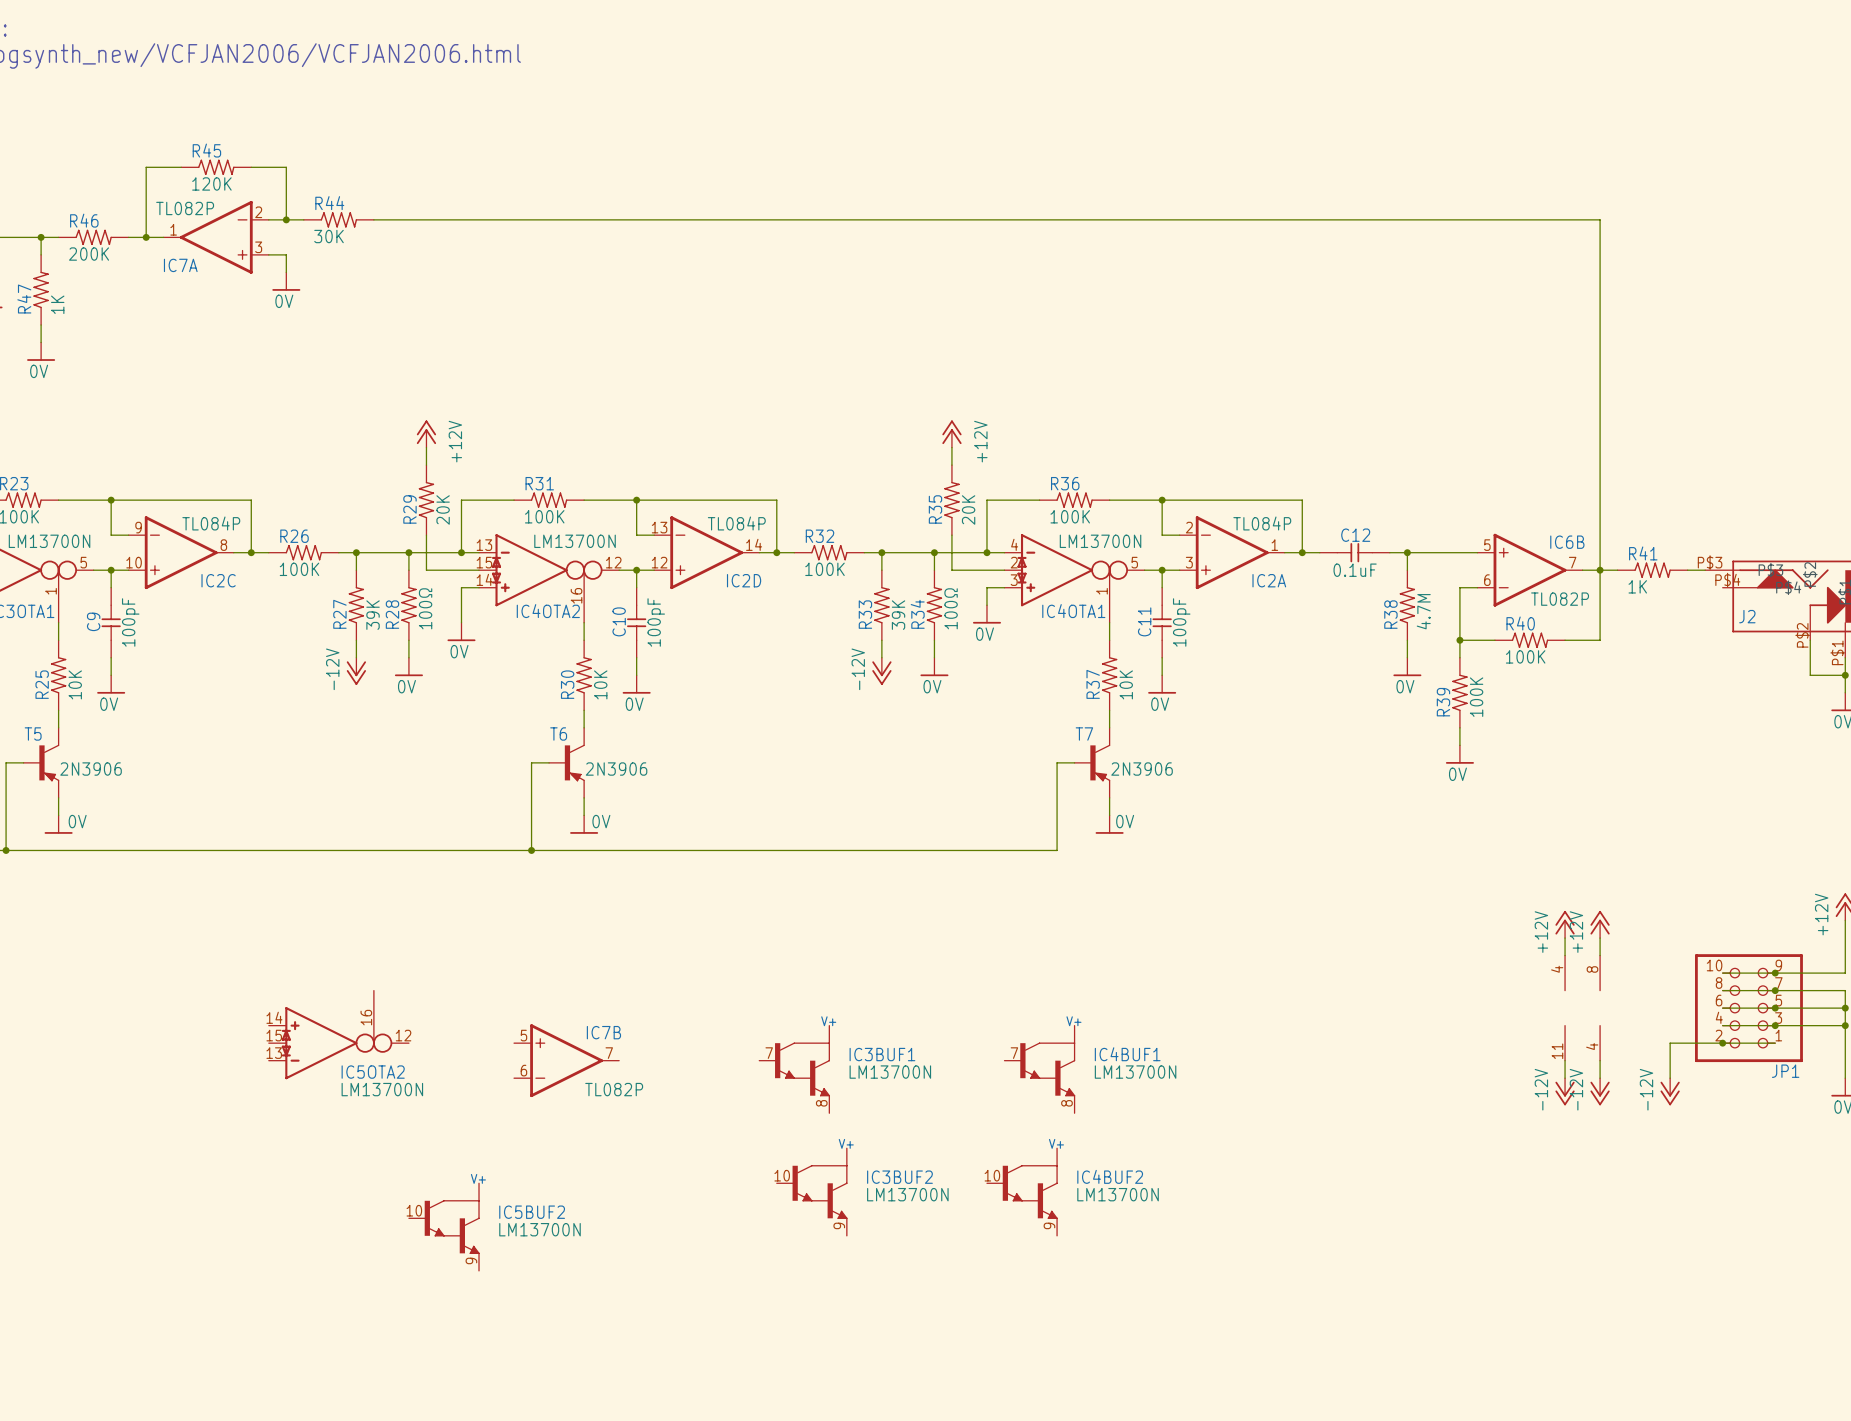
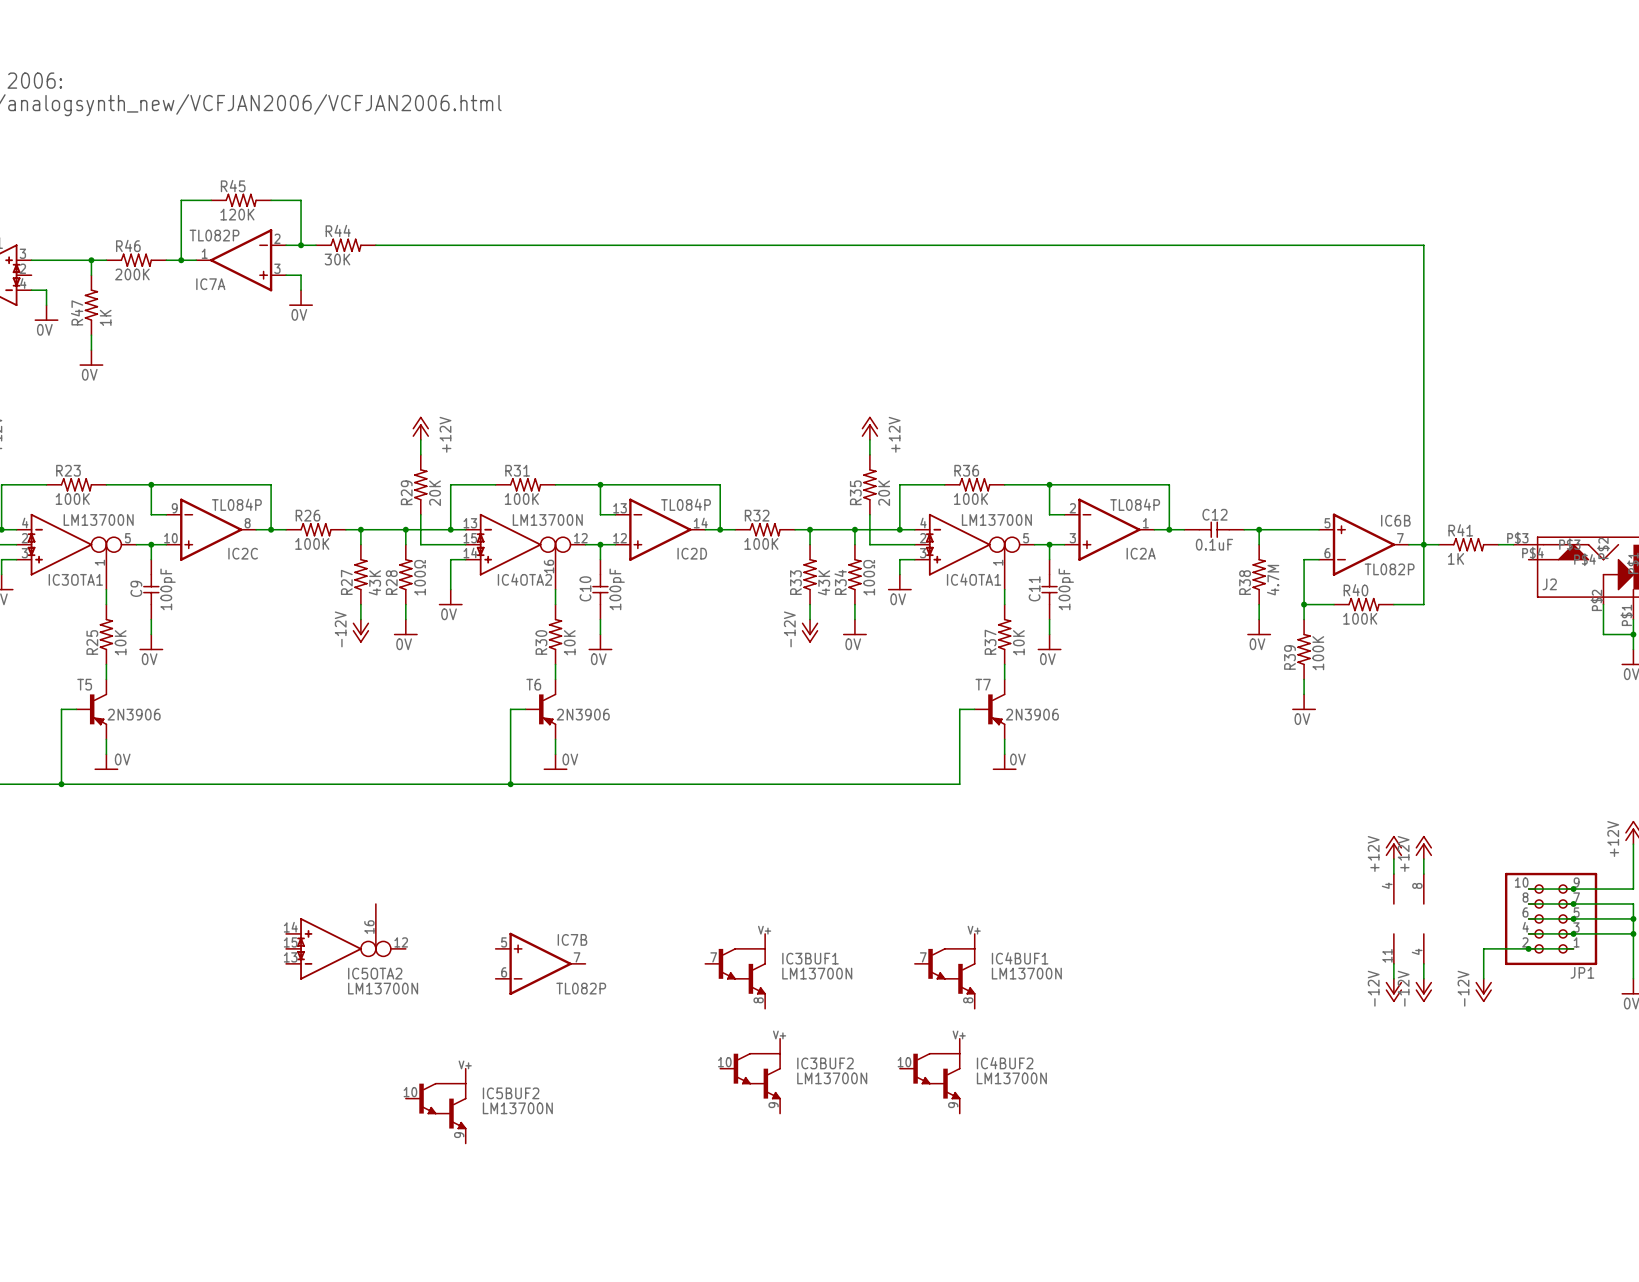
R27 value: 39K (373, 615) -> 43K (374, 582)
R33 value: 39K (898, 615) -> 43K (824, 582)

